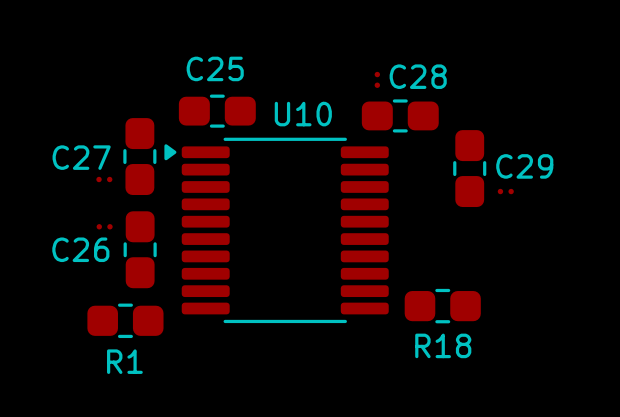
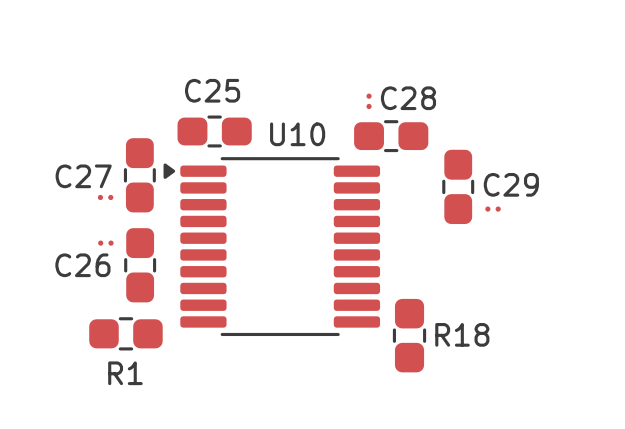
R18 rotation: 0° (442, 306) -> 90° clockwise (409, 335)
R18 name position: R18 (443, 345) -> R18 (462, 334)

